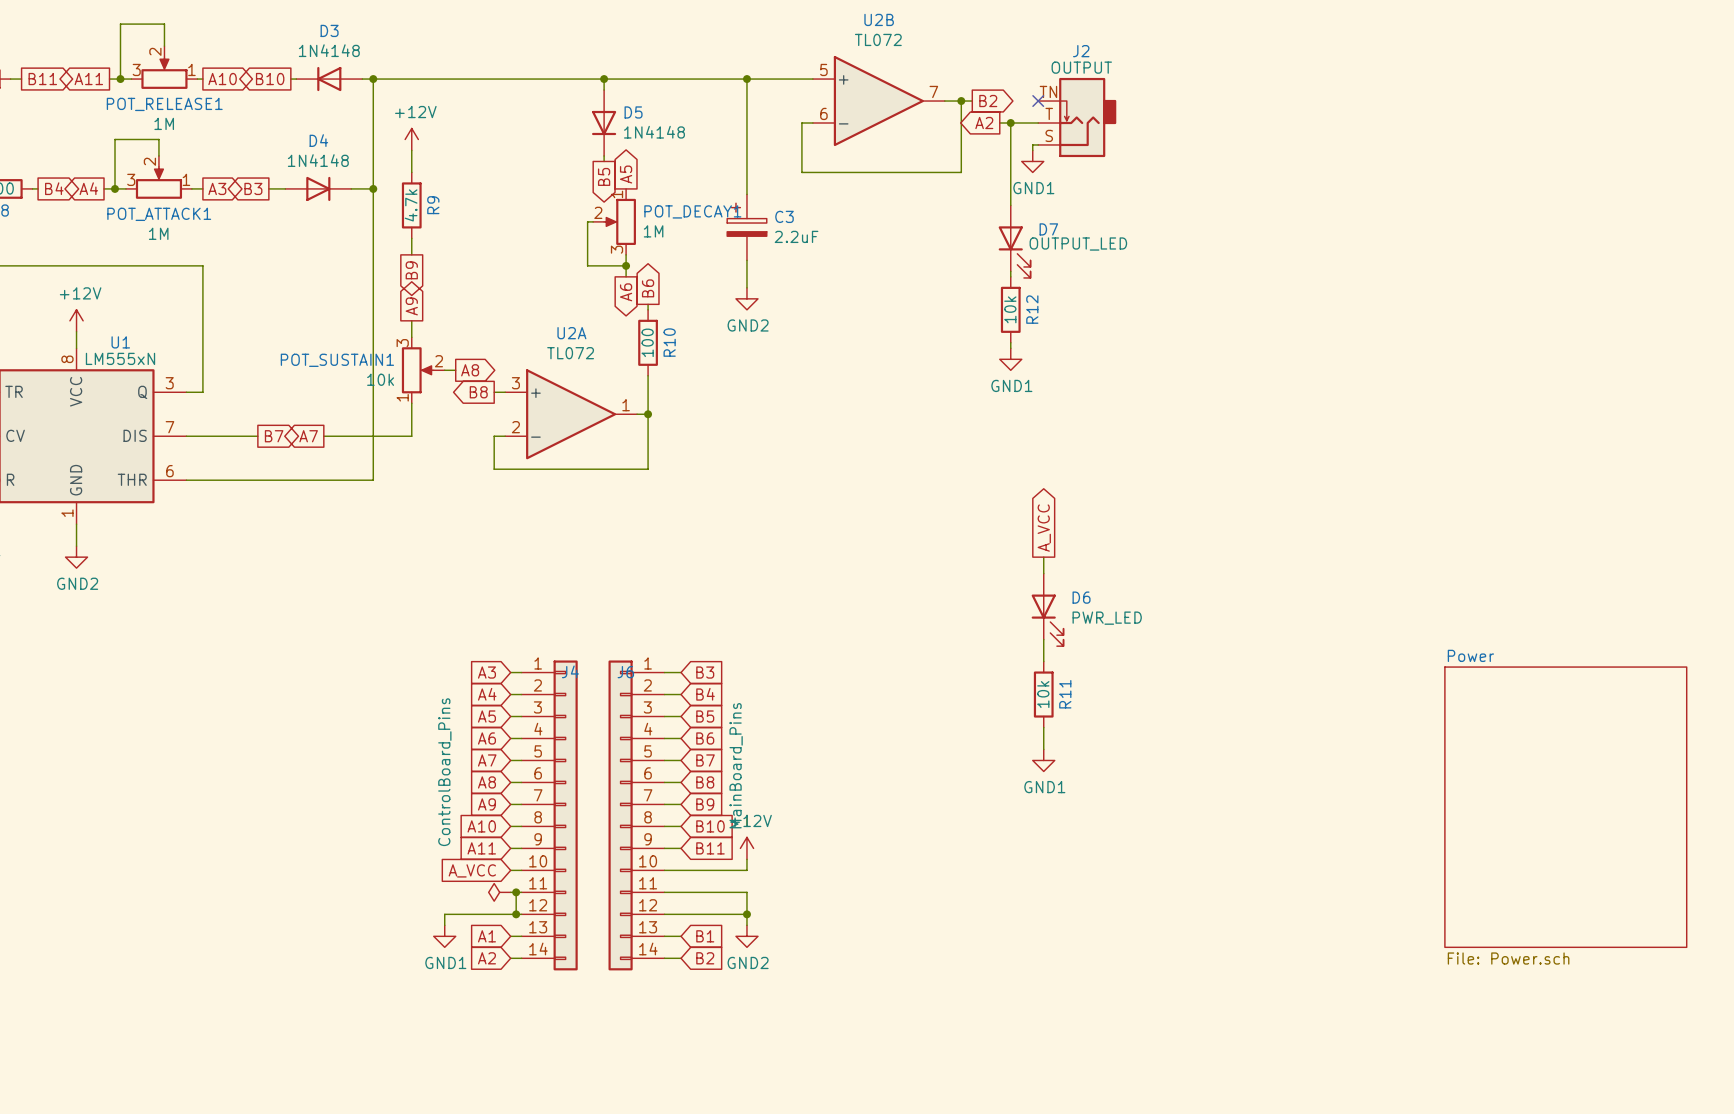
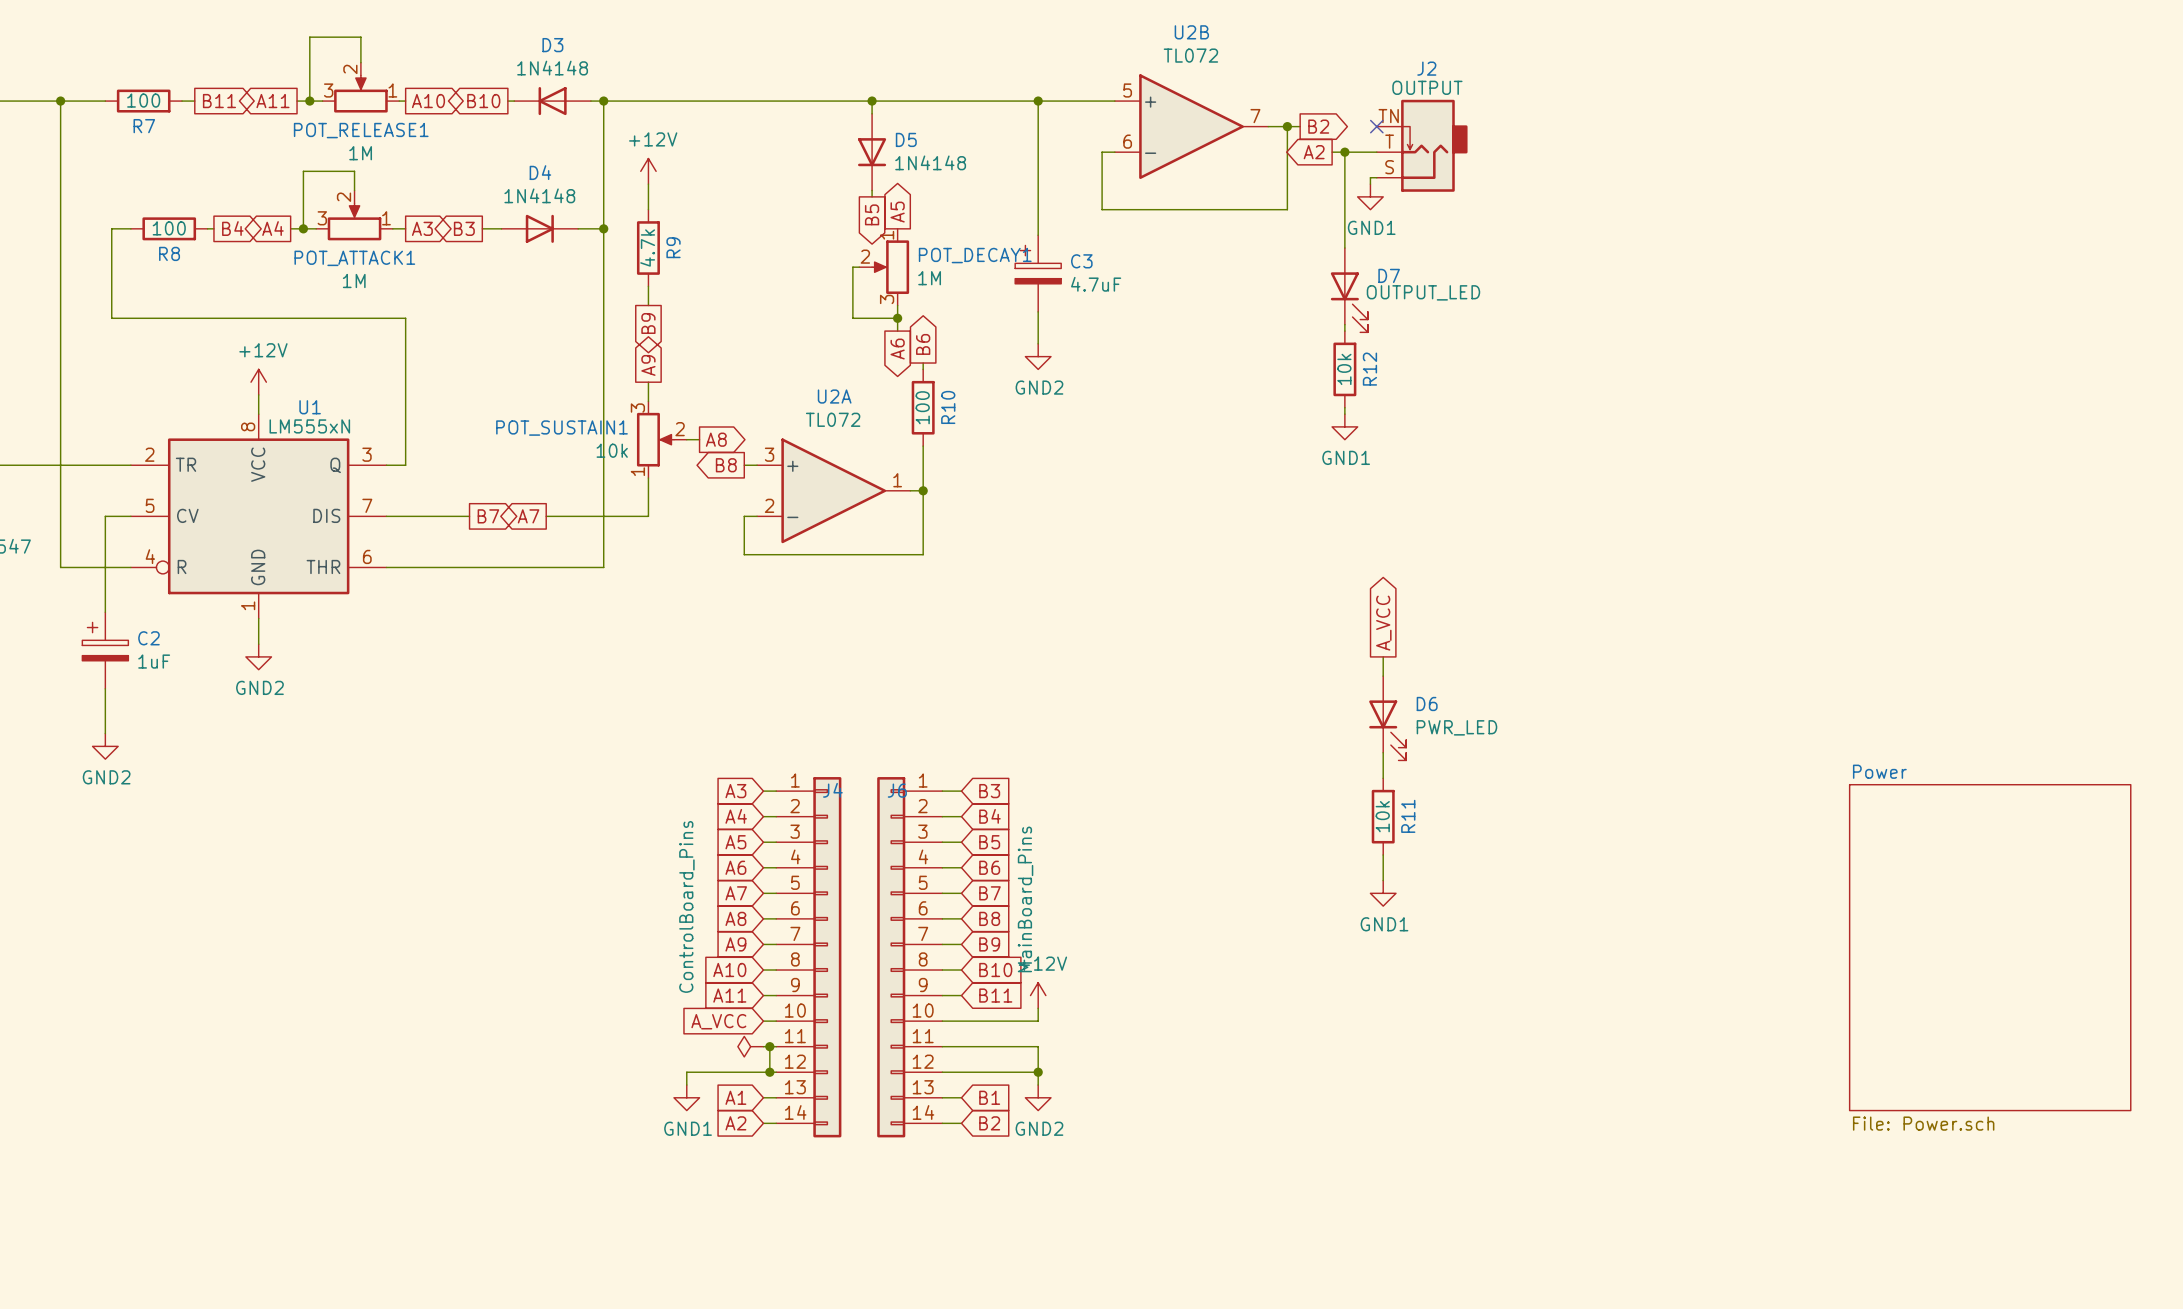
C3 value: 2.2uF (796, 236) -> 4.7uF (1096, 284)

